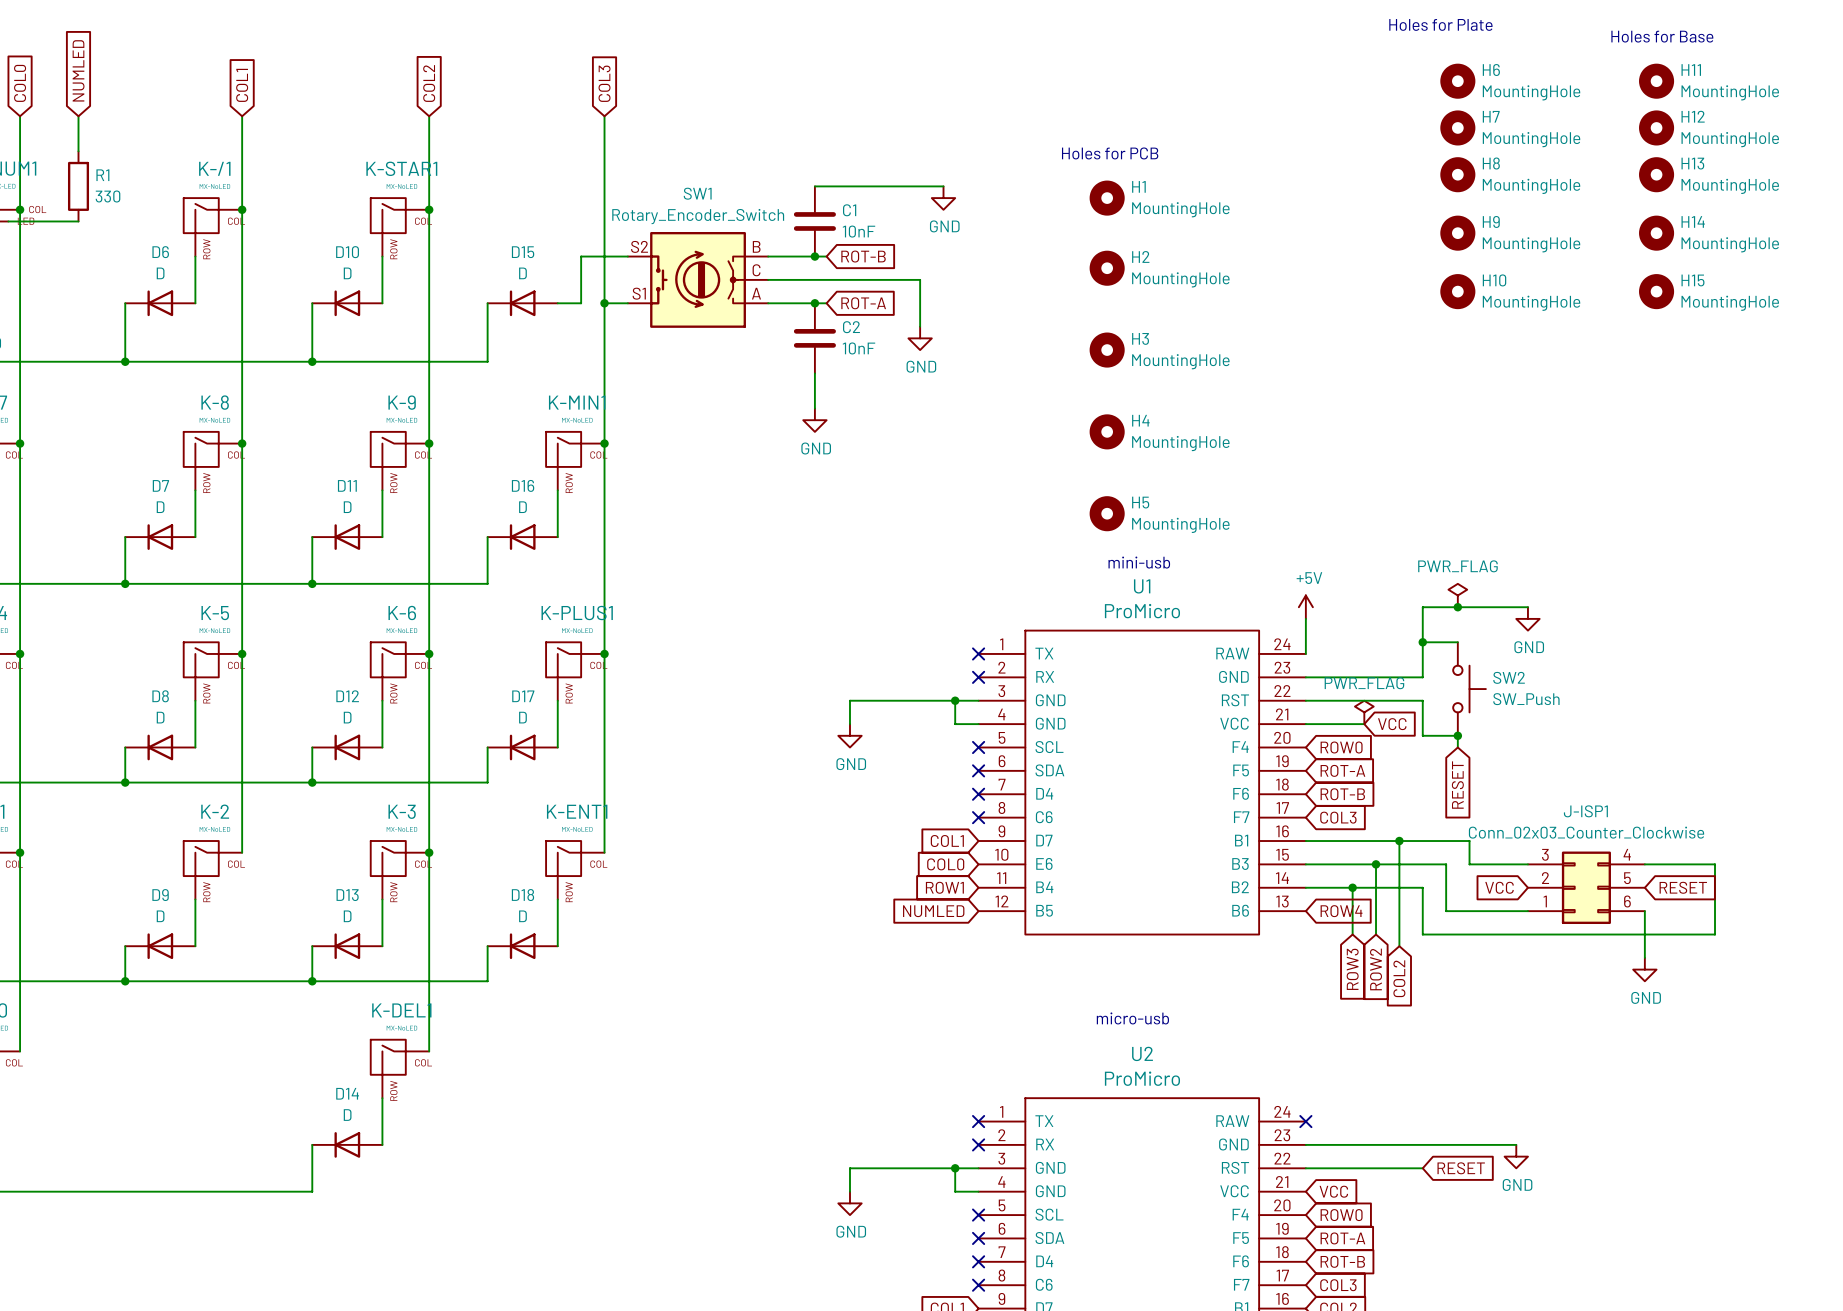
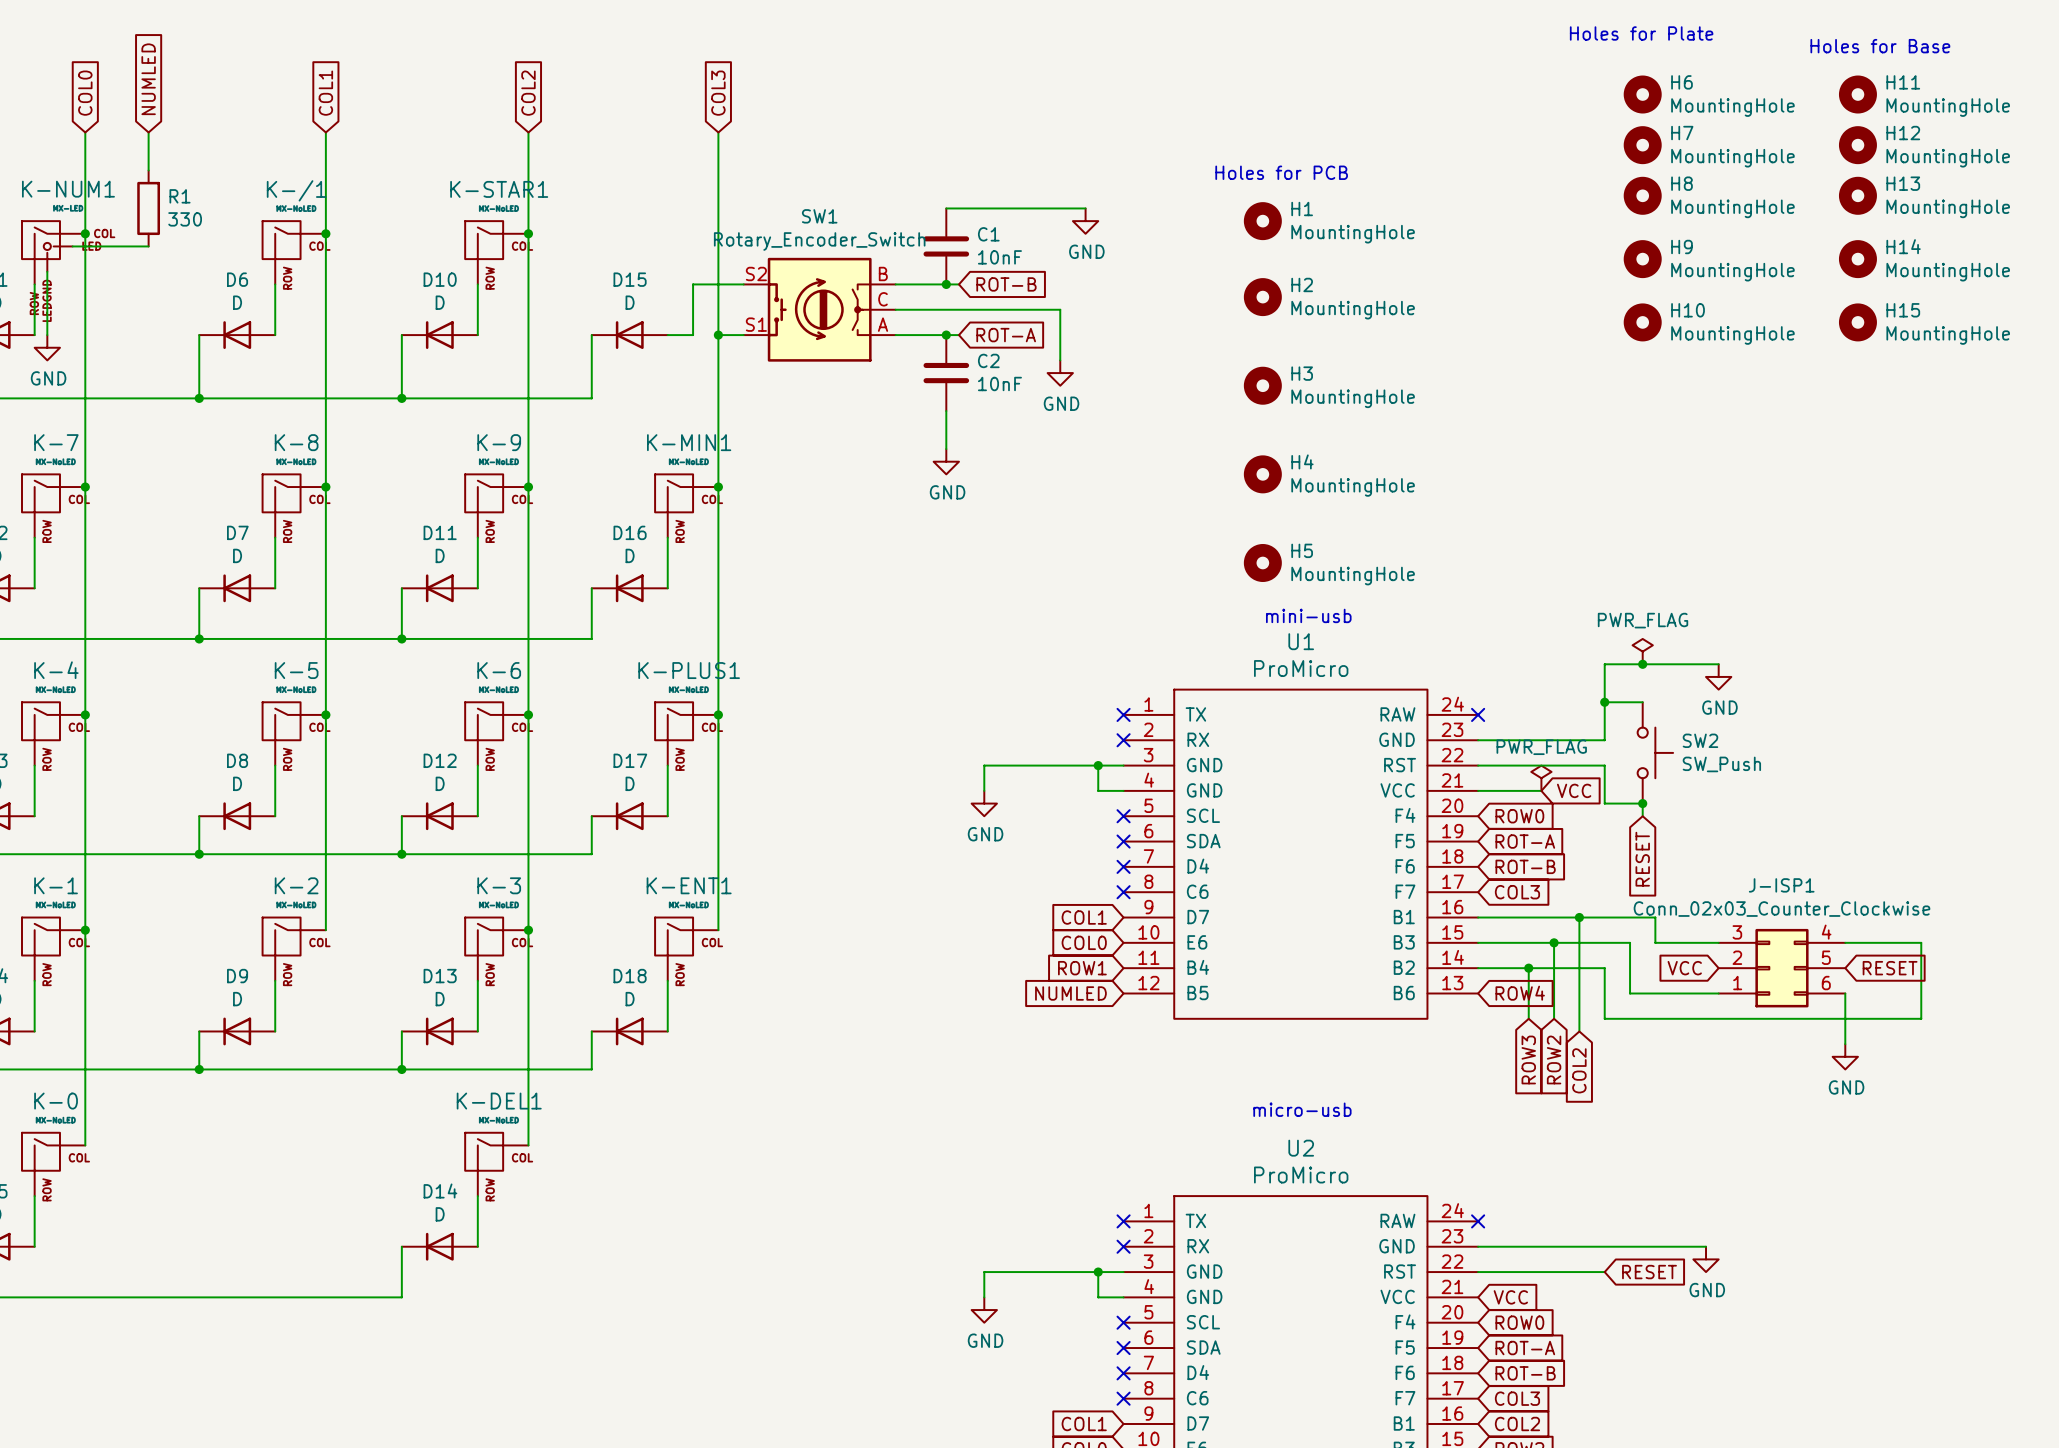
power symbol: +5V (1305, 607) -> none
wire: (1305, 618) (1305, 653) -> none
no-connect mark: none -> (1478, 714)

